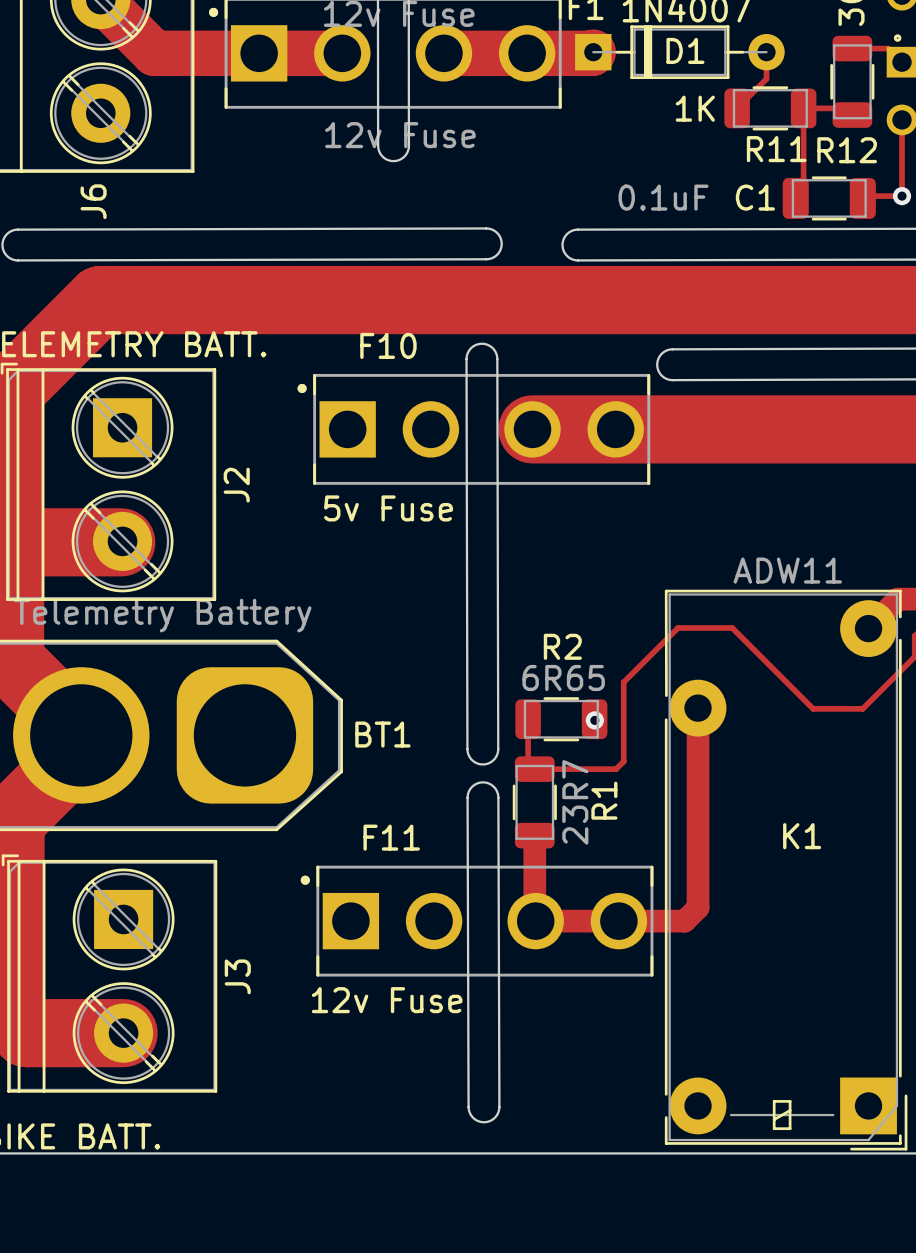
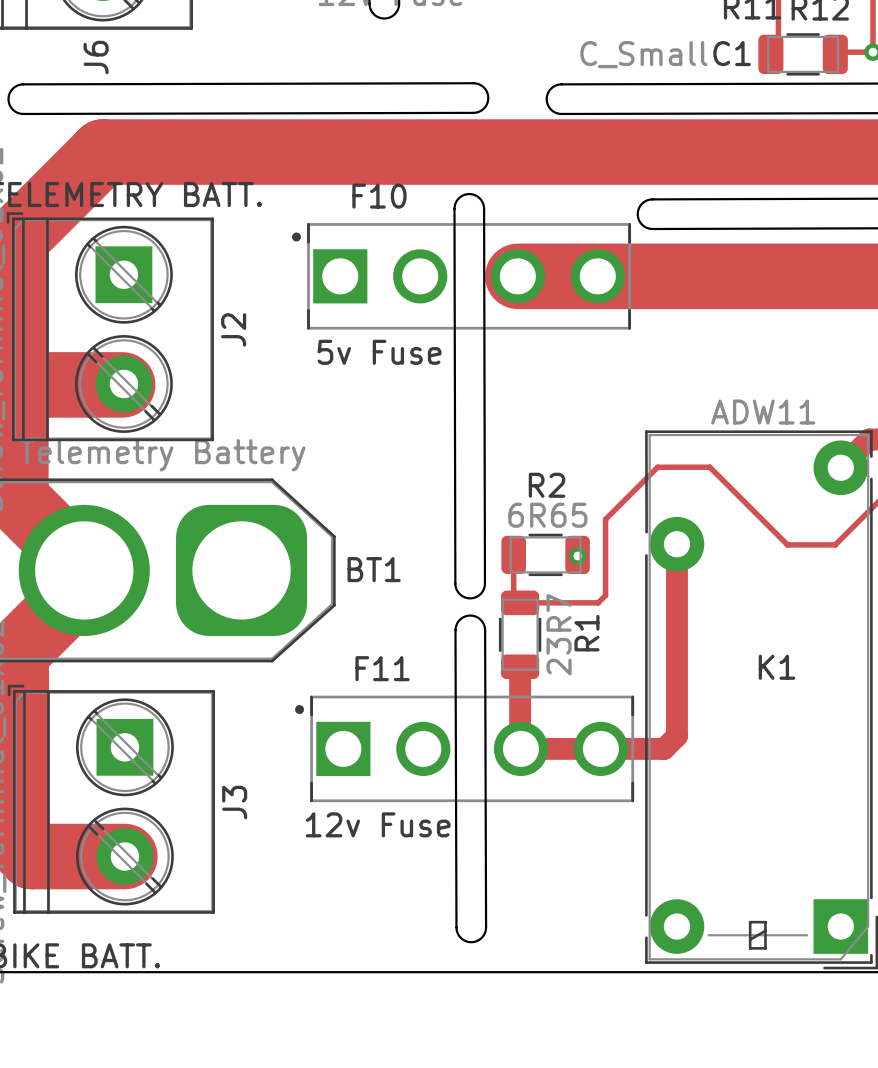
C1 value: 0.1uF (663, 197) -> C_Small (643, 54)

